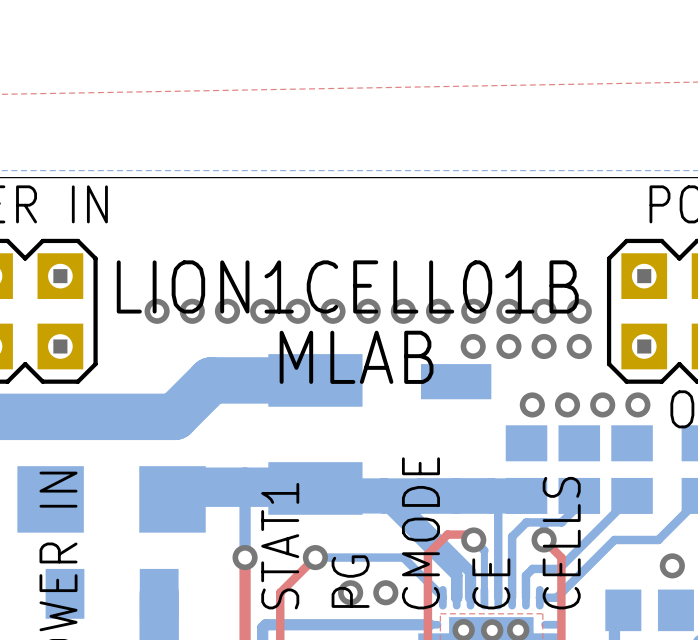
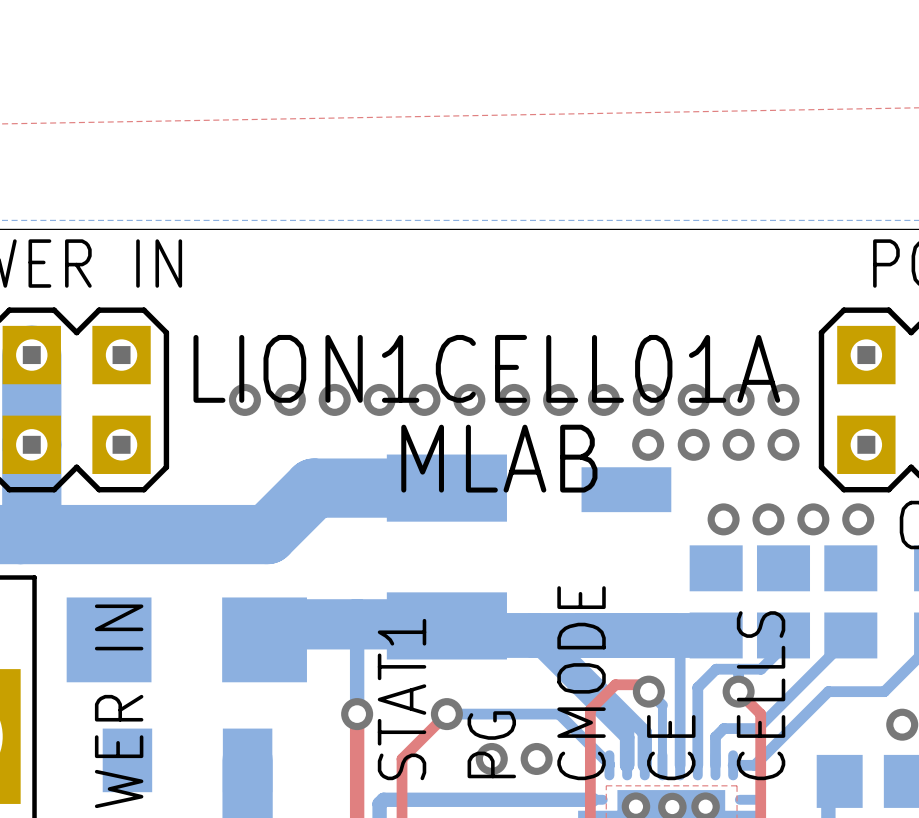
text: LION1CELL01B (347, 286) -> LION1CELL01A (486, 368)

